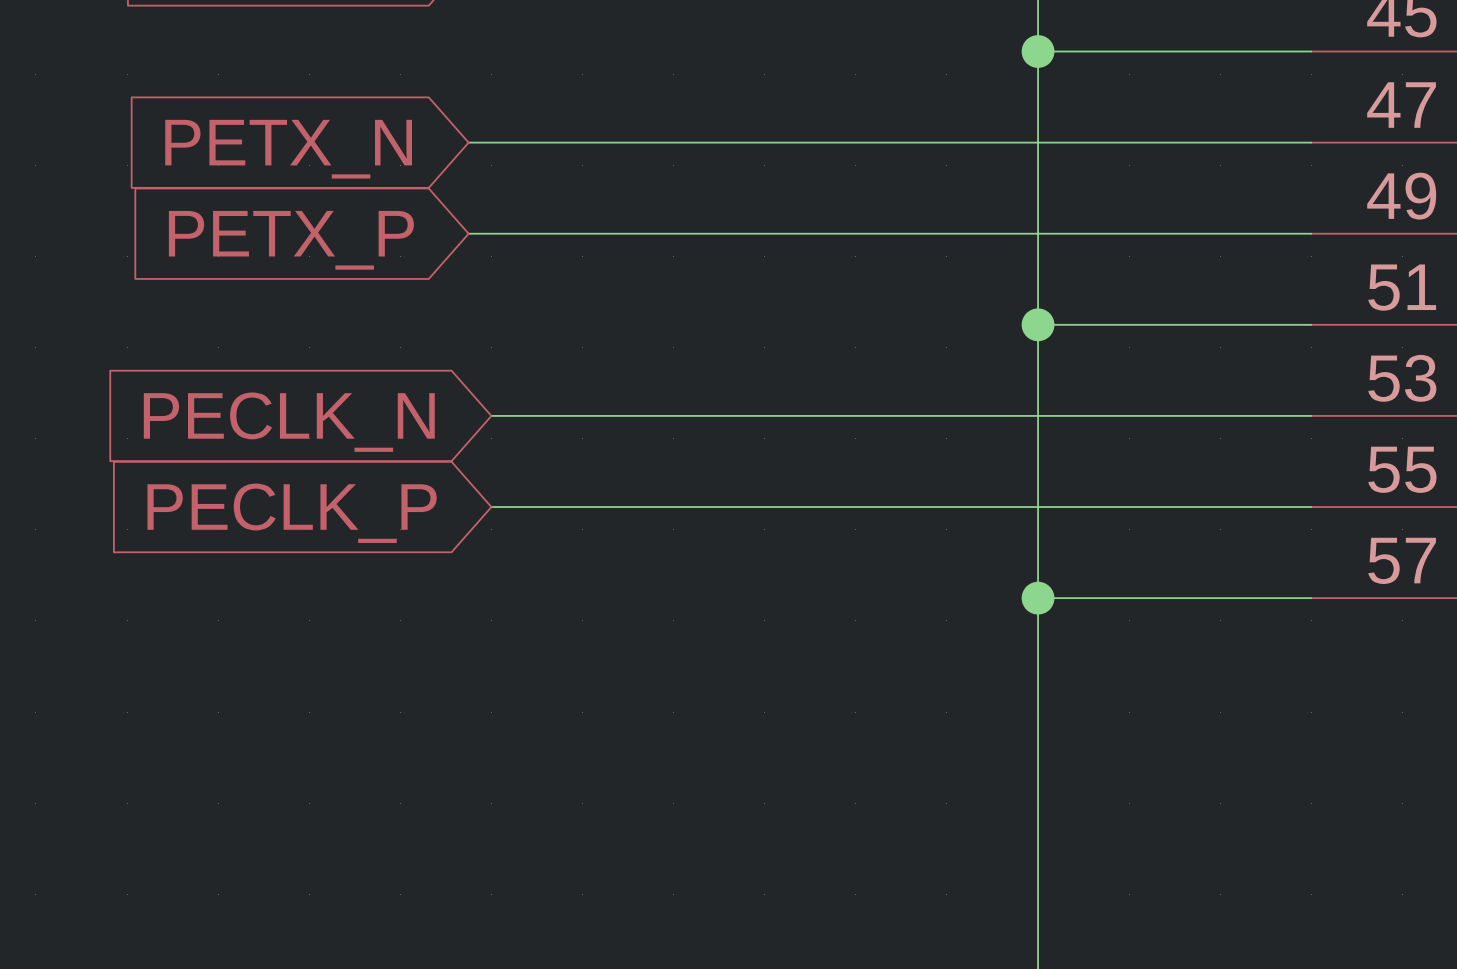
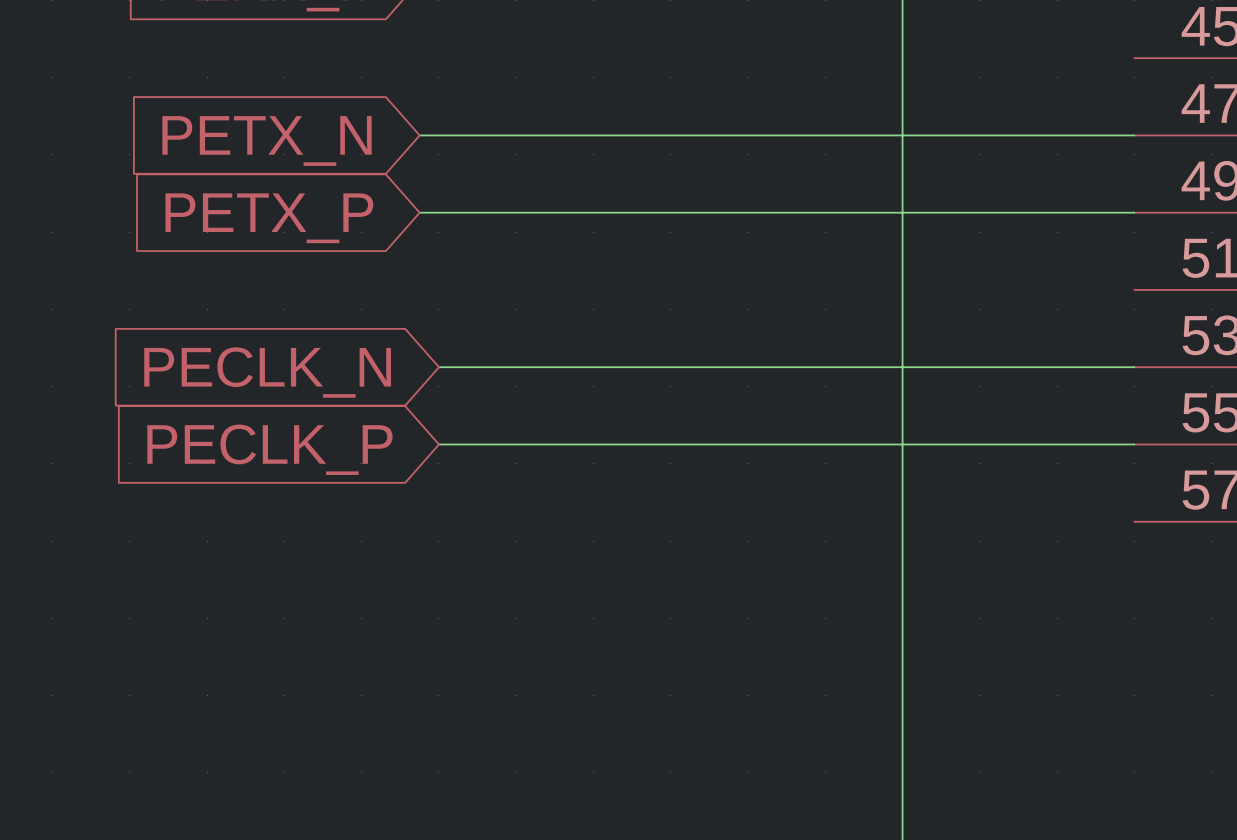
wire: (1038, 51) (1311, 51) -> none
junction: (1038, 51) -> none
wire: (1038, 324) (1311, 324) -> none
junction: (1038, 324) -> none
wire: (1038, 598) (1311, 598) -> none
junction: (1038, 598) -> none

